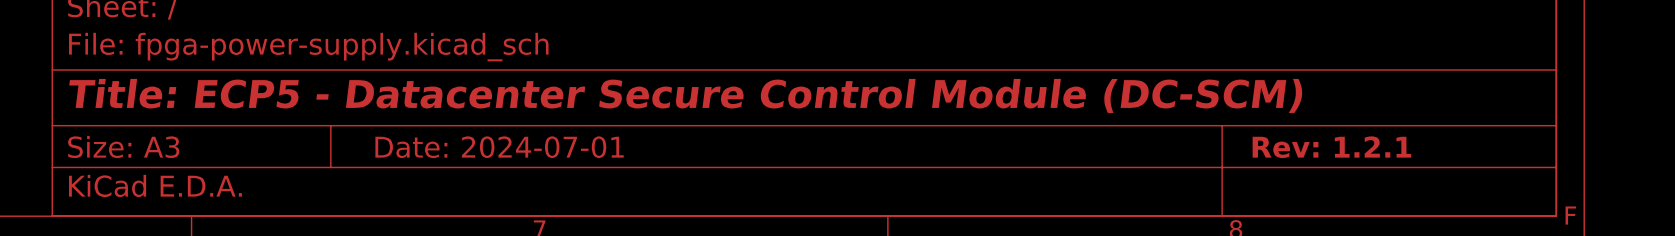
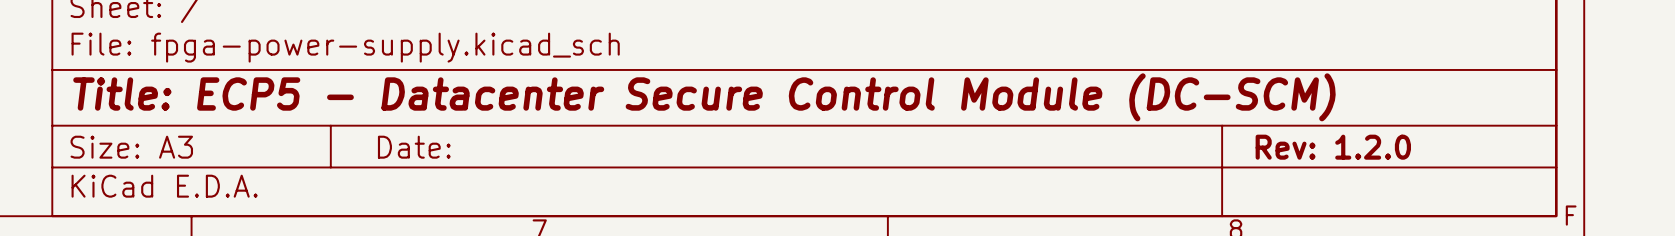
title block: Date: 2024-07-01 (499, 147) -> Date: (414, 147)
title block: Rev: 1.2.1 (1331, 147) -> Rev: 1.2.0 (1333, 147)

